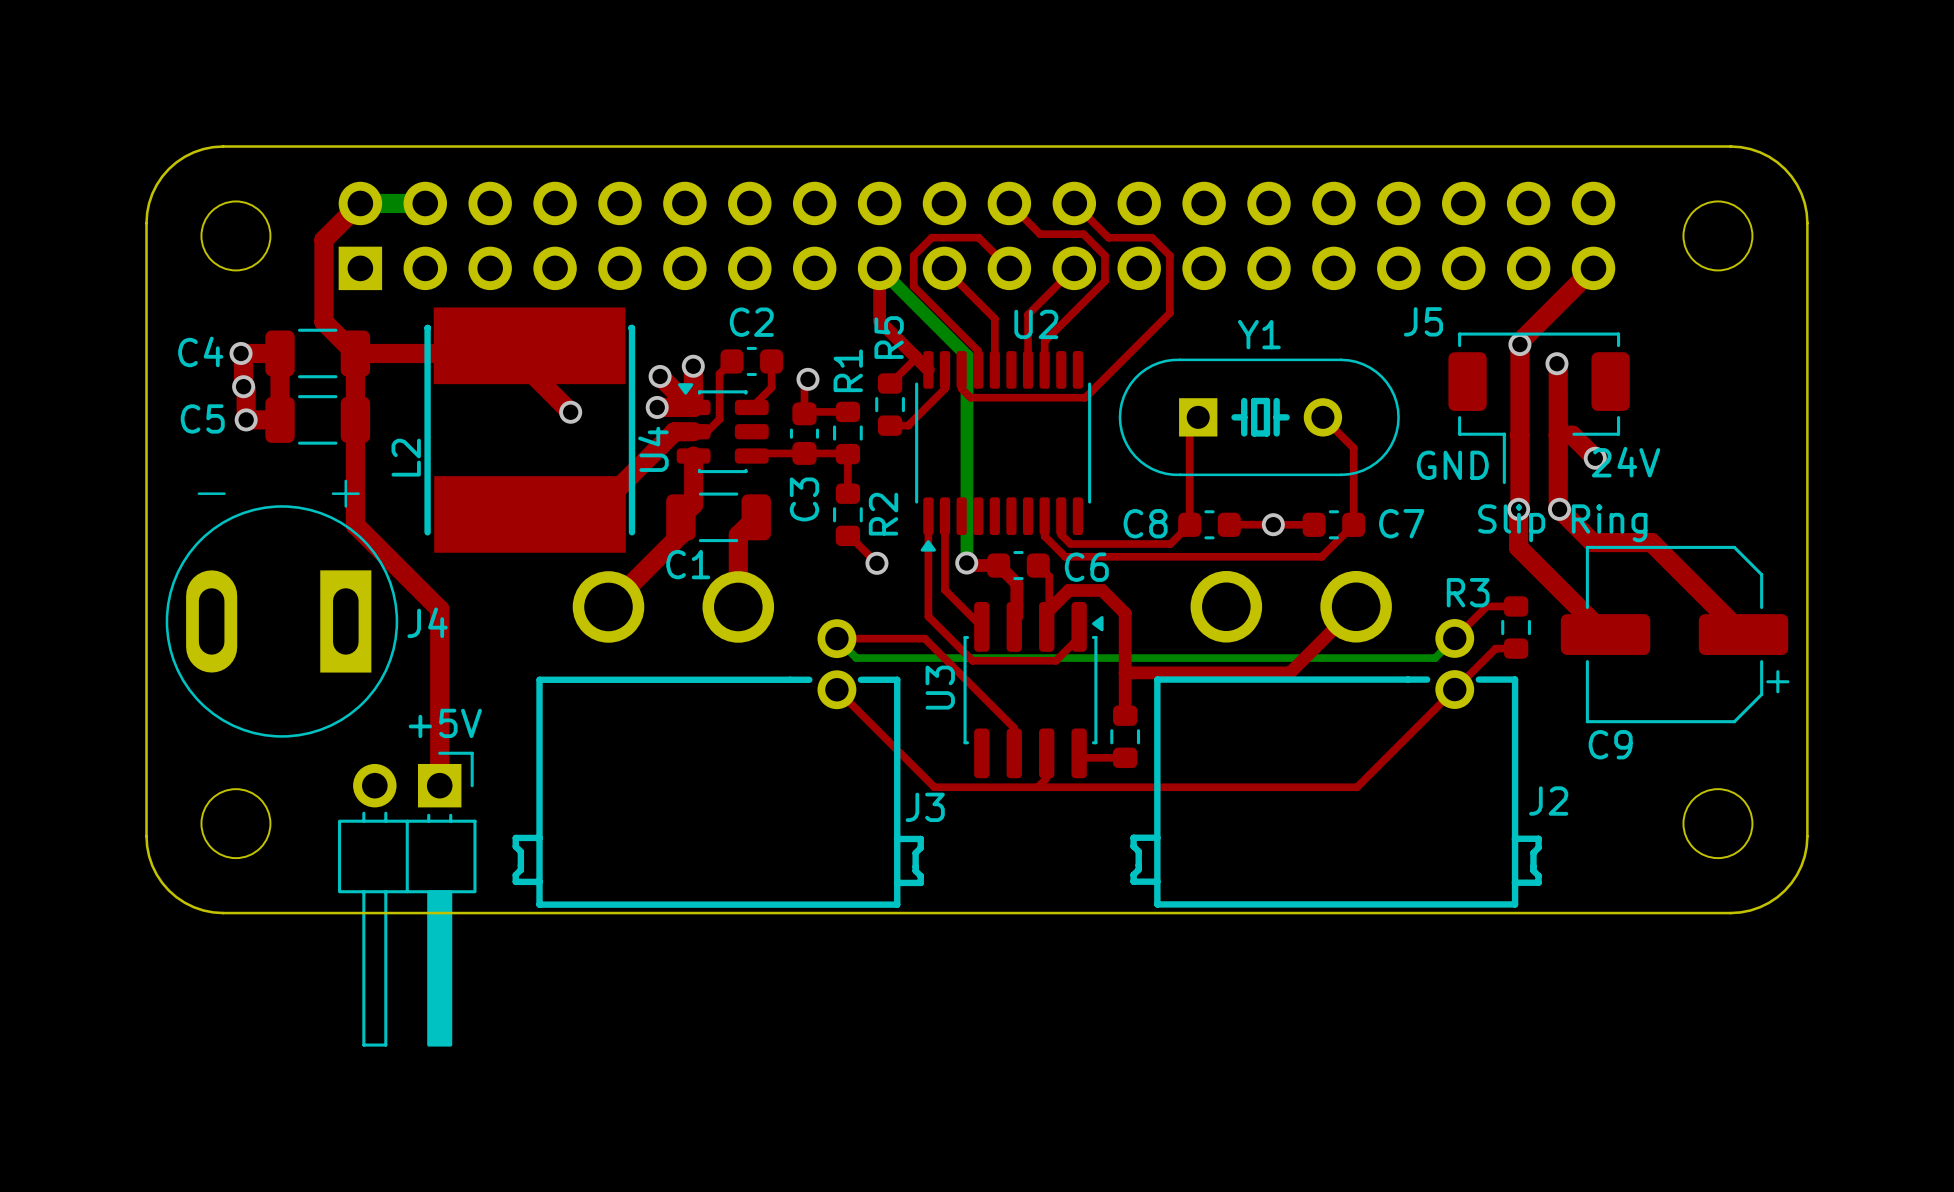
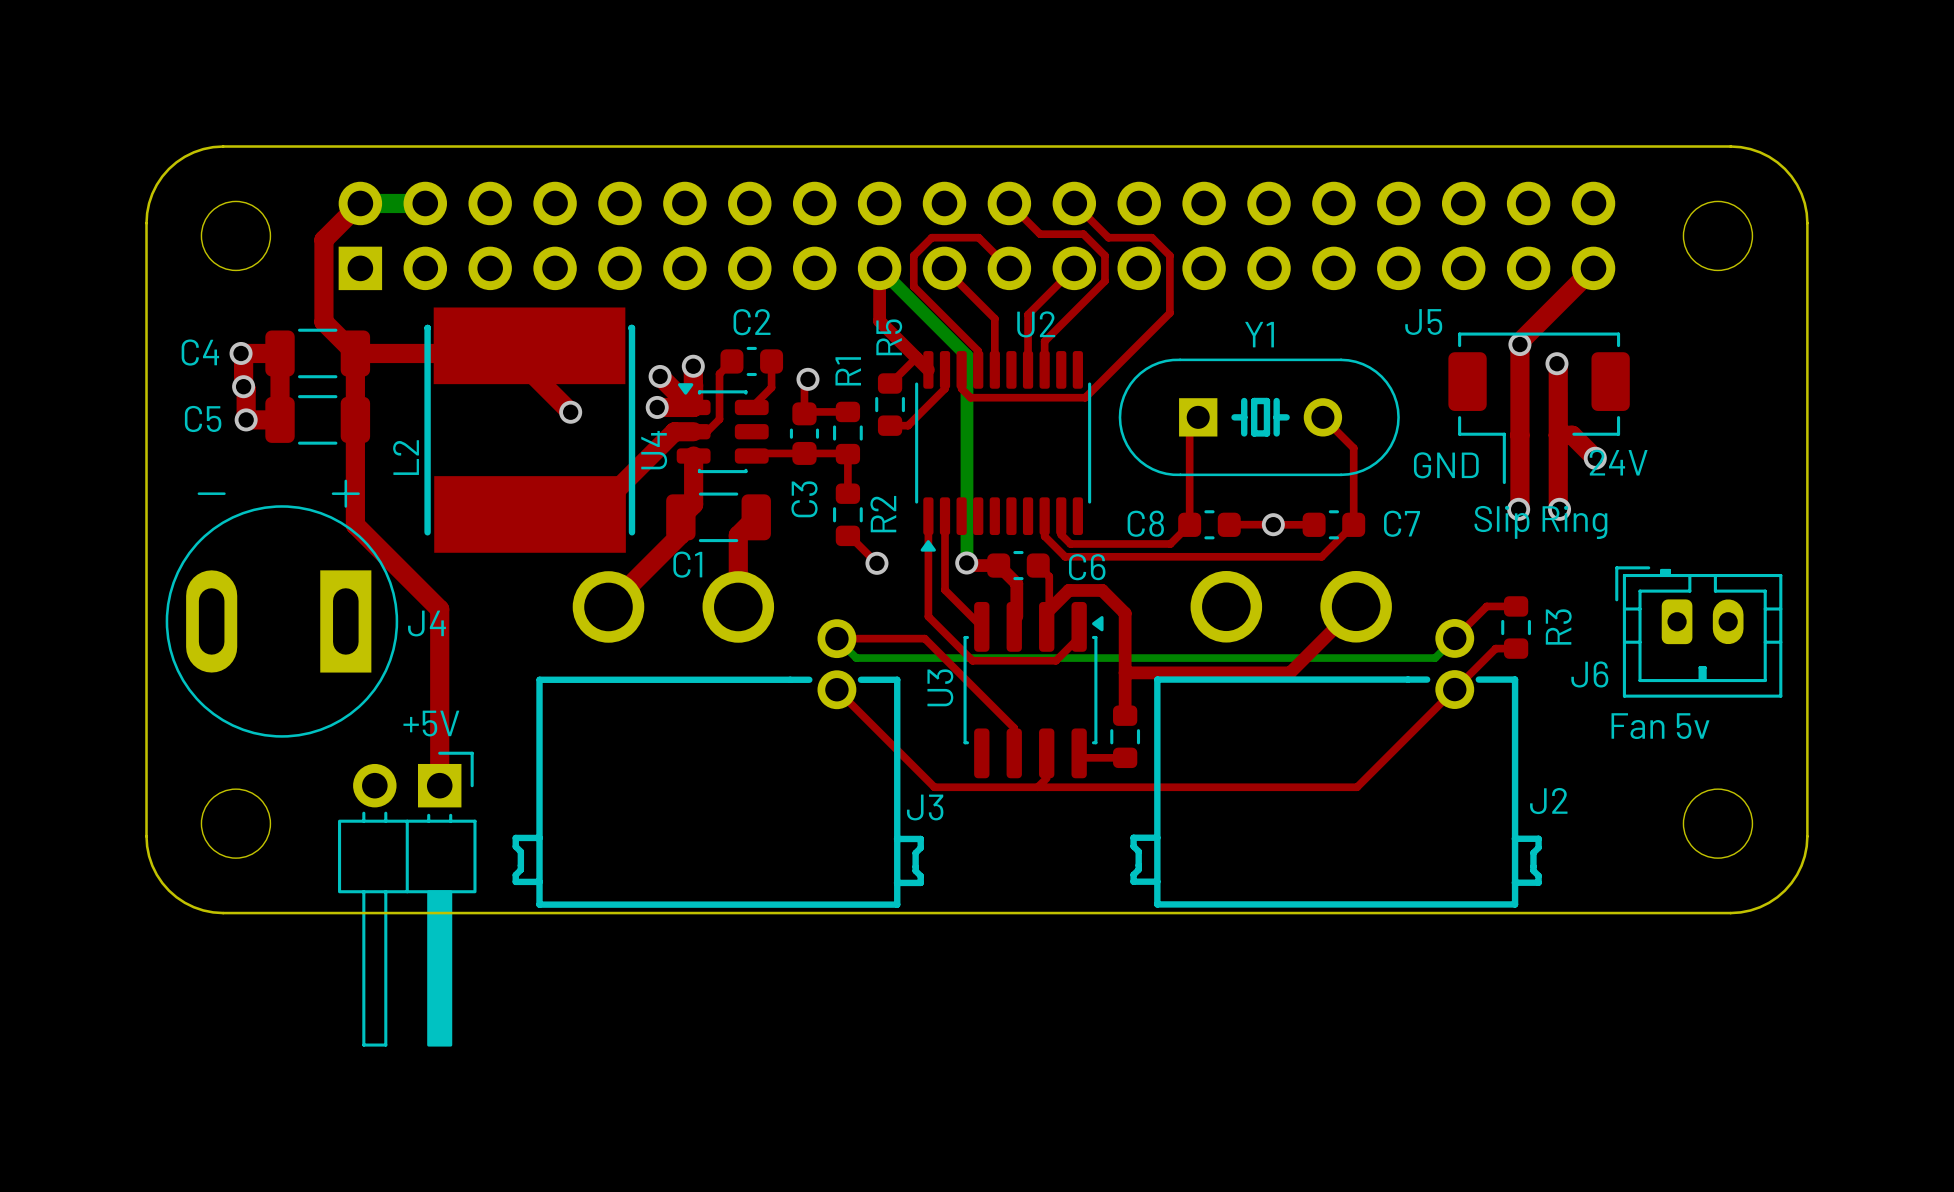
top track: (1518, 509) (1518, 547) (1605, 634) -> none
top track: (1559, 509) (1592, 542) (1651, 542) (1743, 634) -> none
R3 name rotation: 0° (1468, 592) -> 90° counterclockwise (1558, 626)
R3 name position: R3 (1468, 592) -> R3 (1558, 626)
J6: none -> (1698, 631)
C9: (1675, 634) -> none
text: none -> Fan 5v (1660, 726)

